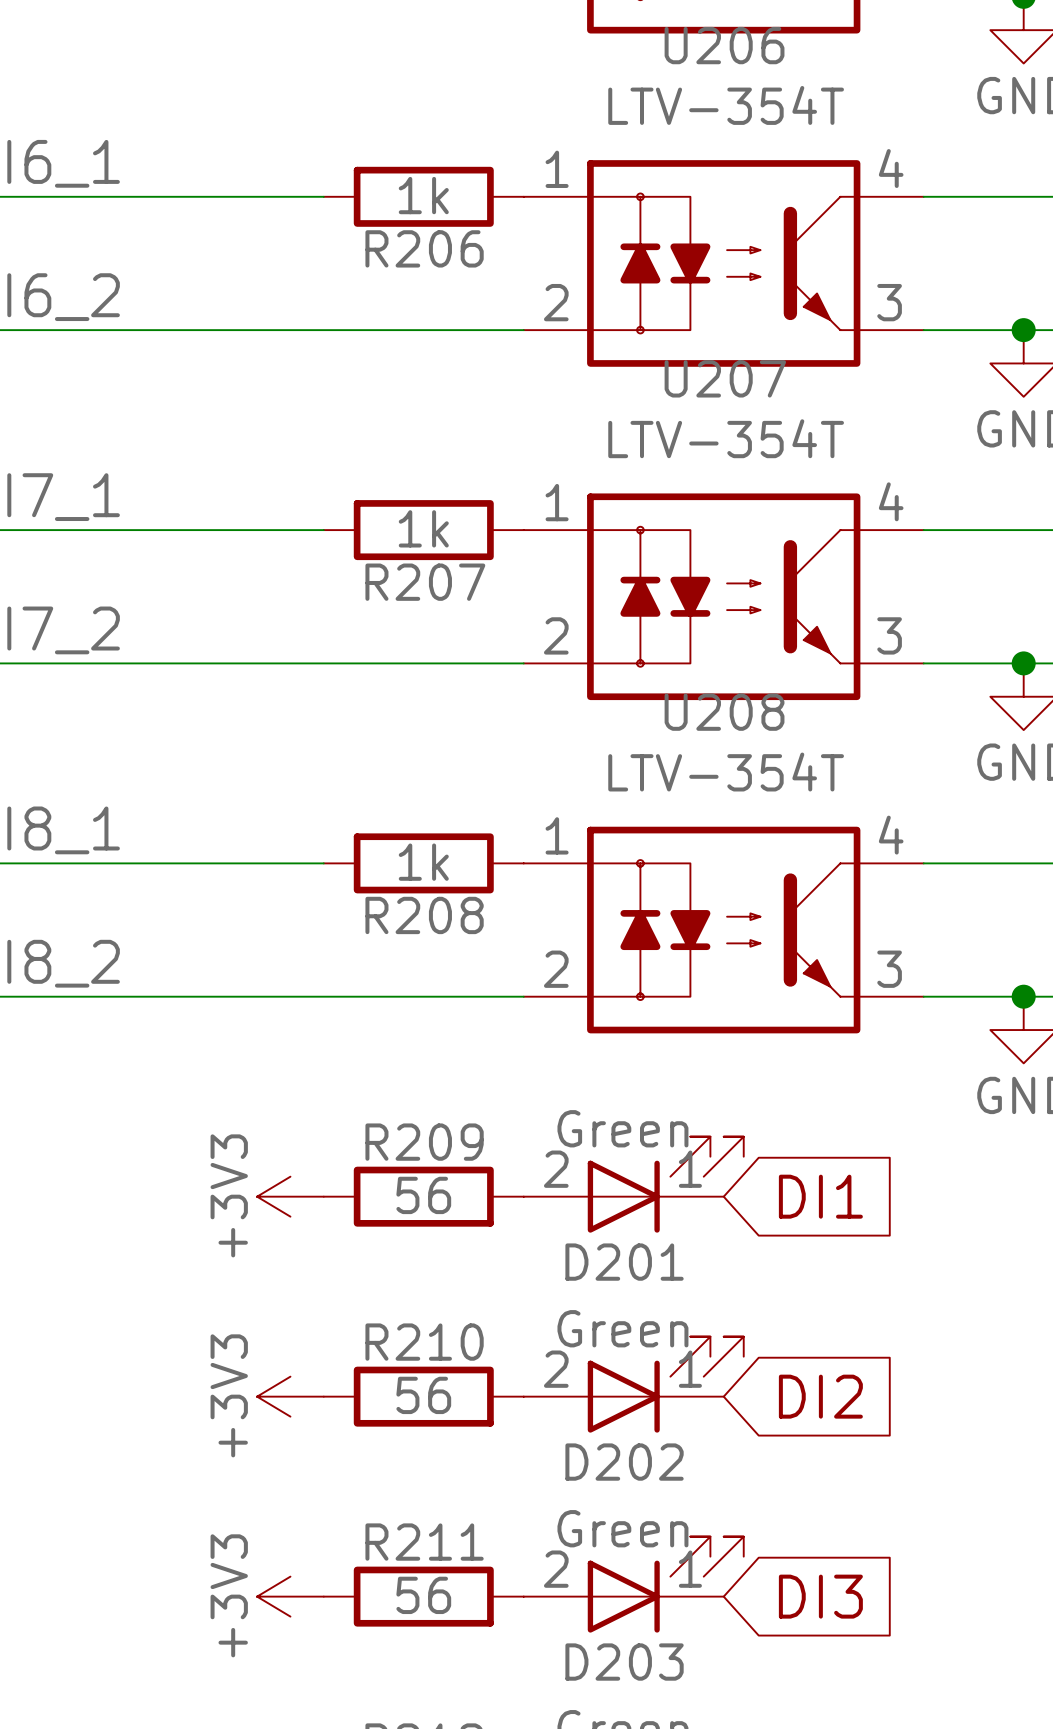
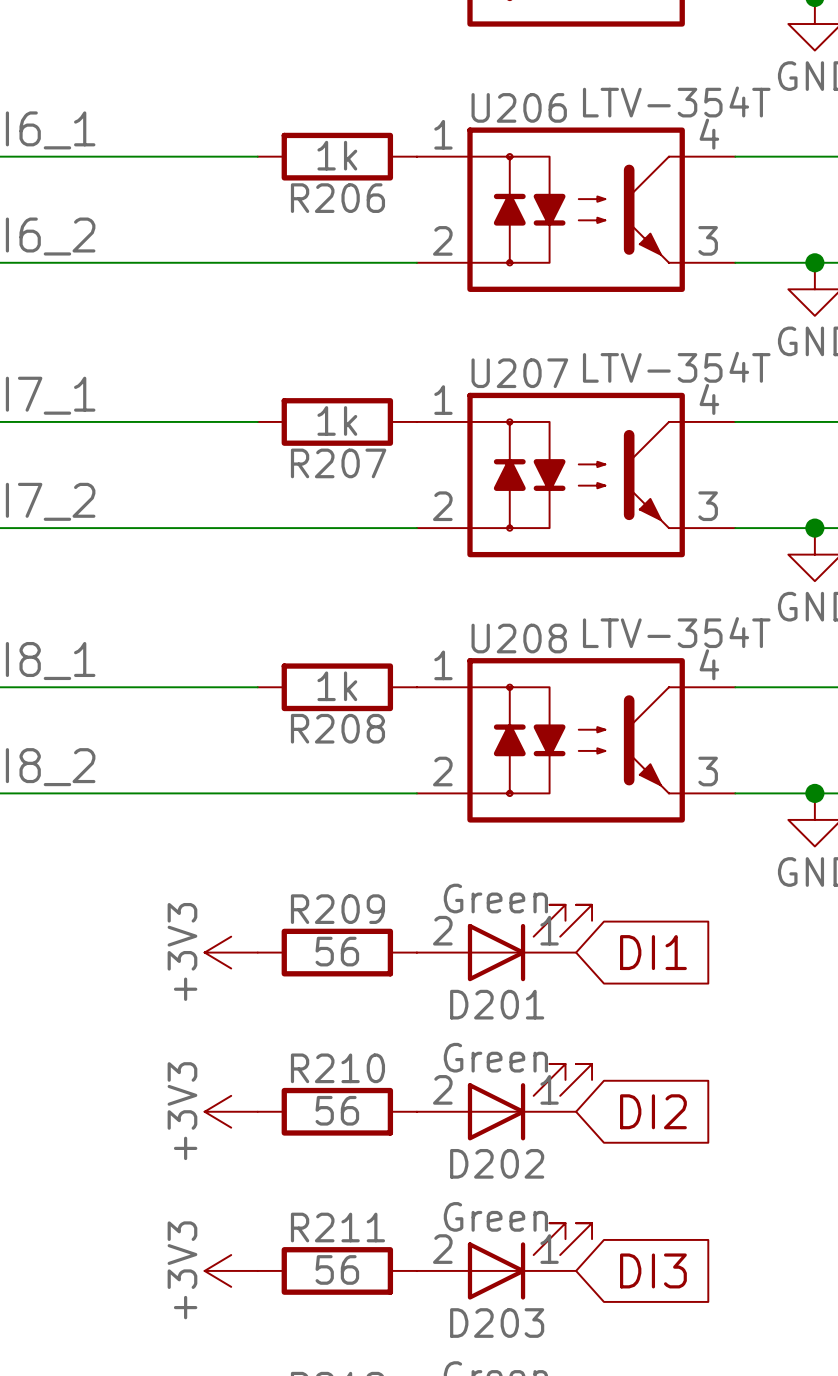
U206 name position: U206 (724, 45) -> U206 (519, 107)
U206 value position: LTV-354T (726, 105) -> LTV-354T (676, 101)
U207 name position: U207 (725, 378) -> U207 (519, 373)
U207 value position: LTV-354T (726, 438) -> LTV-354T (676, 367)
U208 name position: U208 (724, 712) -> U208 (519, 638)
U208 value position: LTV-354T (726, 772) -> LTV-354T (676, 632)

